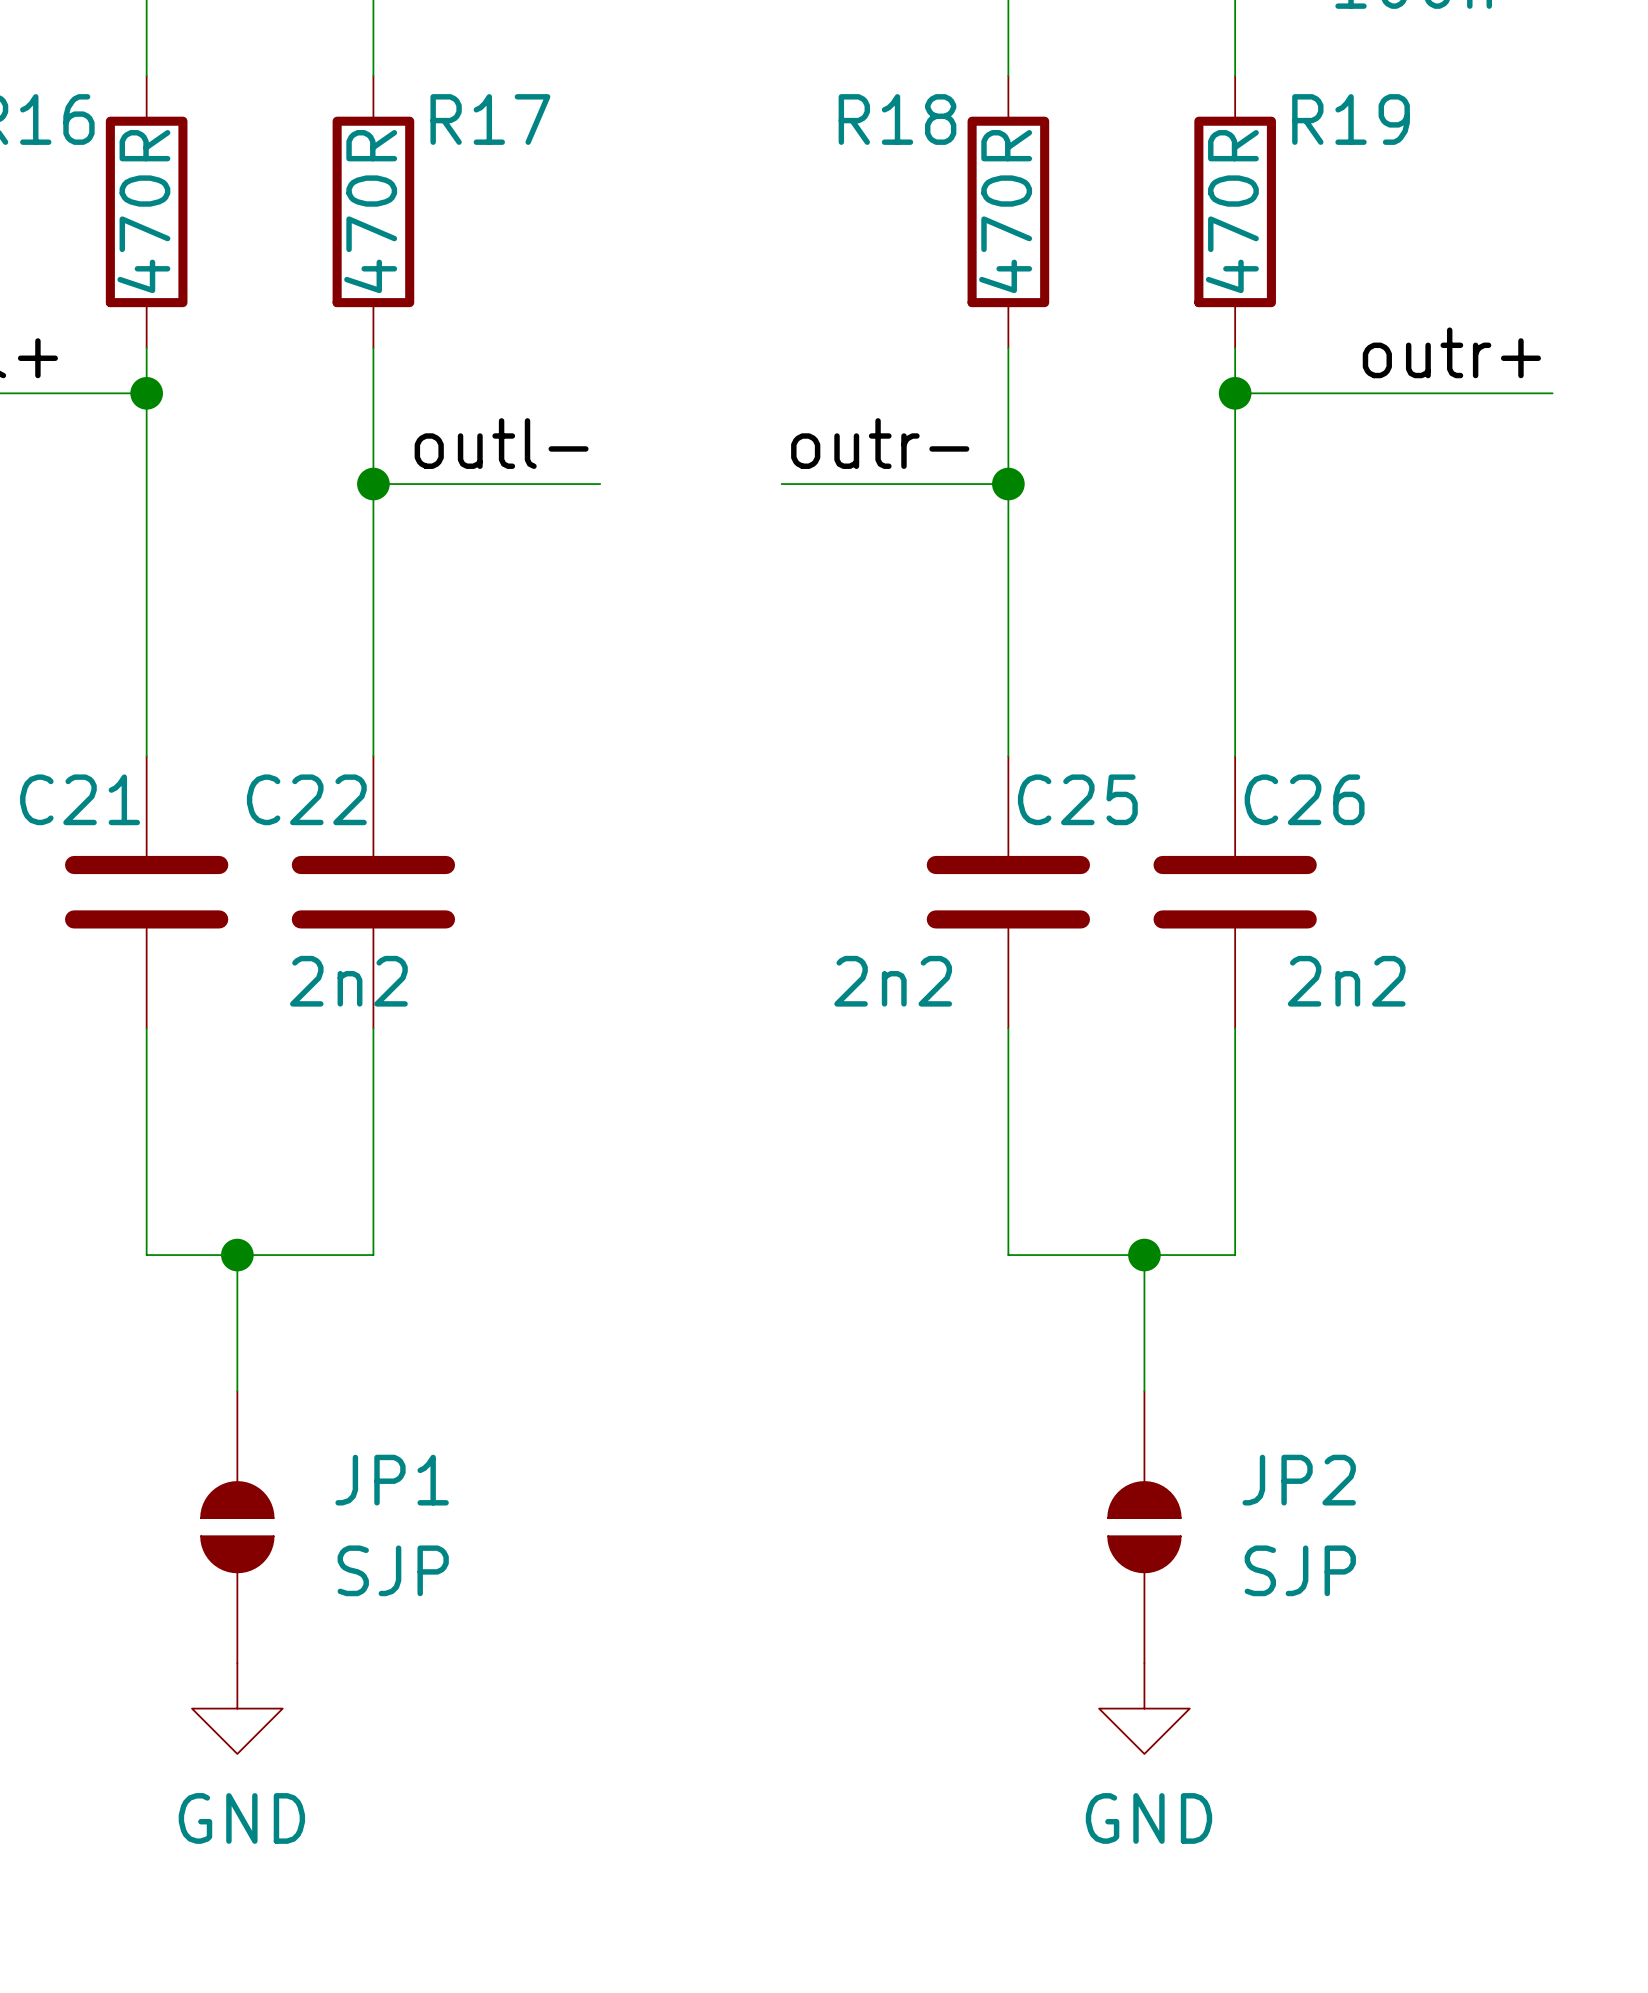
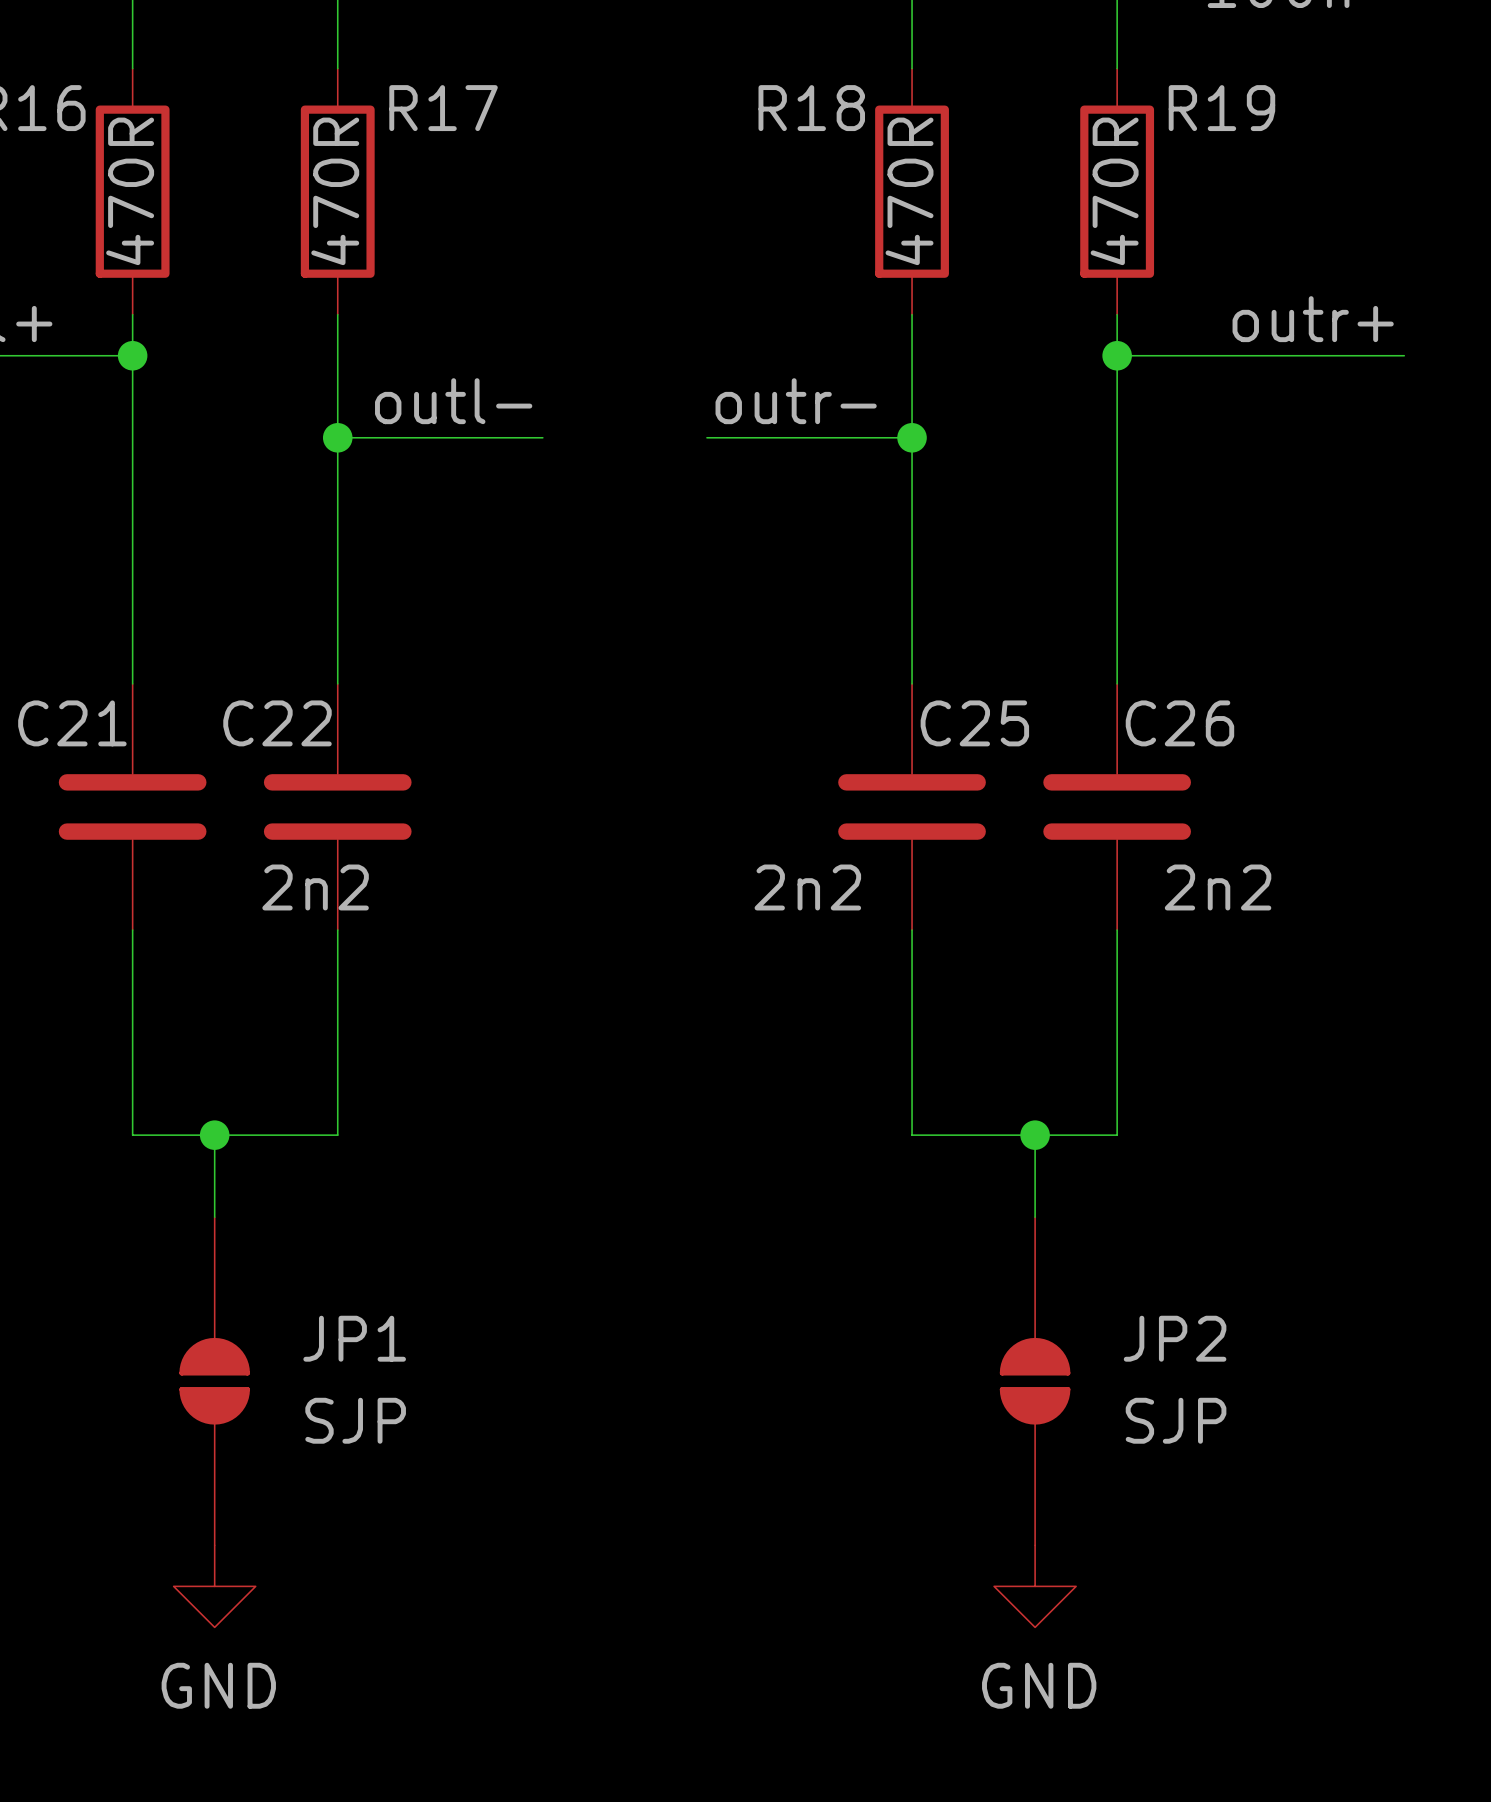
JP1 symbol: [201, 1391, 274, 1664] -> [179, 1217, 250, 1546]
JP2 symbol: [1108, 1391, 1181, 1664] -> [999, 1217, 1071, 1546]
power symbol position: GND (237, 1708) -> GND (214, 1586)
power symbol position: GND (1144, 1708) -> GND (1035, 1586)

